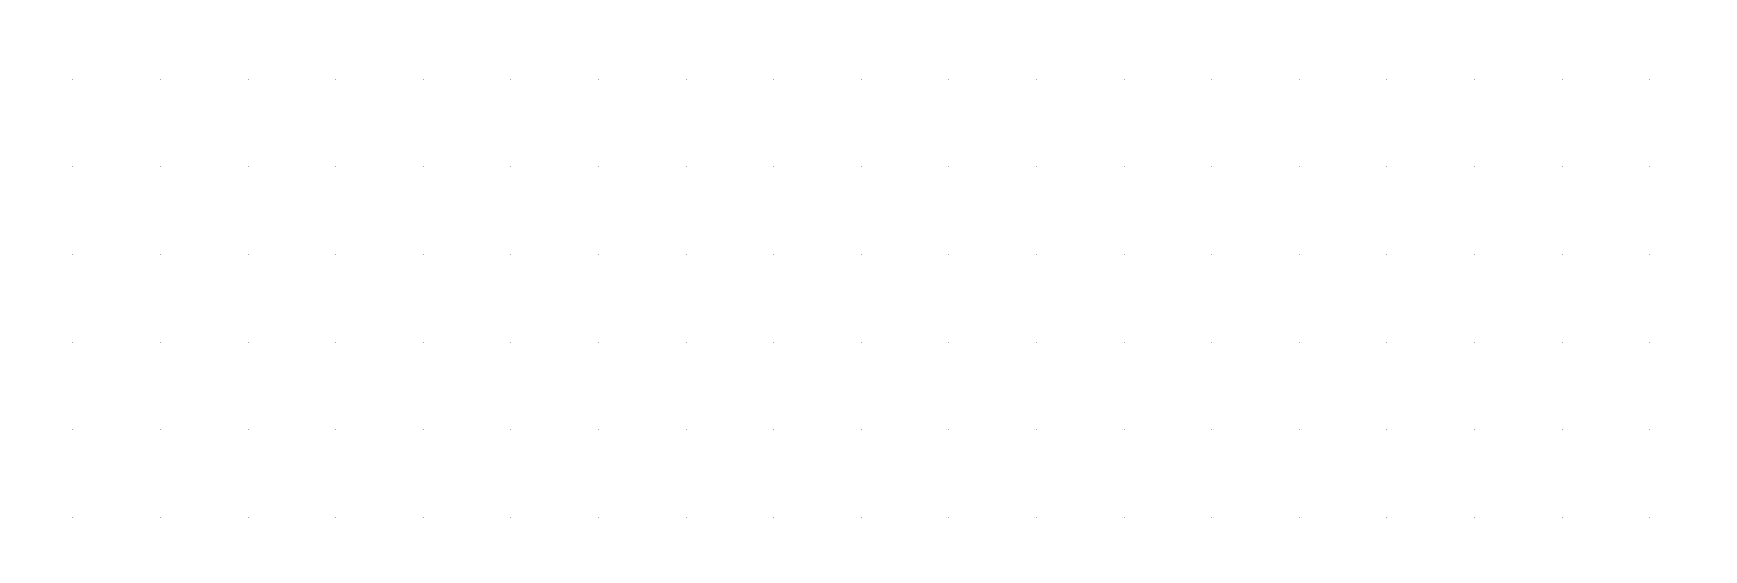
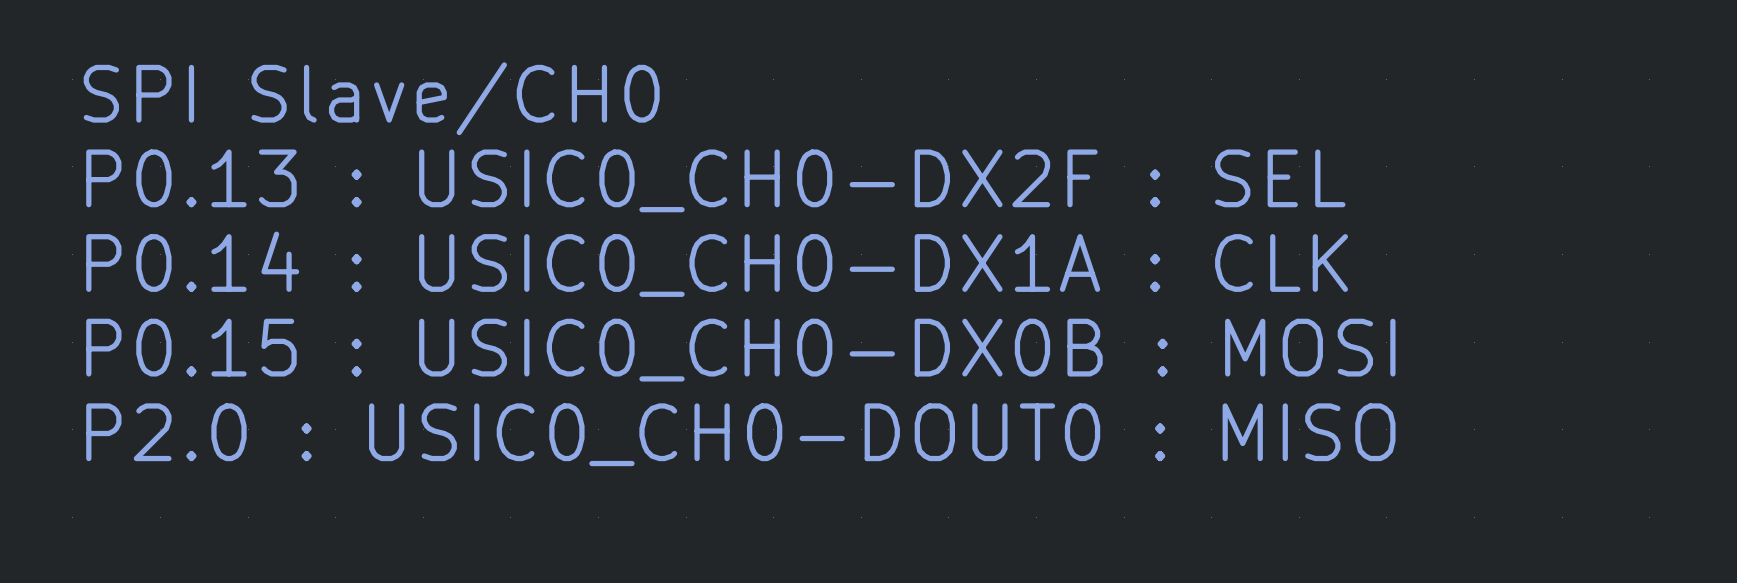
text: none -> SPI Slave/CH0 (371, 98)
text: none -> P0.13 : USIC0_CH0-DX2F : SEL (715, 180)
text: none -> P0.14 : USIC0_CH0-DX1A : CLK (717, 264)
text: none -> P0.15 : USIC0_CH0-DX0B : MOSI (740, 350)
text: none -> P2.0 : USIC0_CH0-DOUT0 : MISO (740, 434)

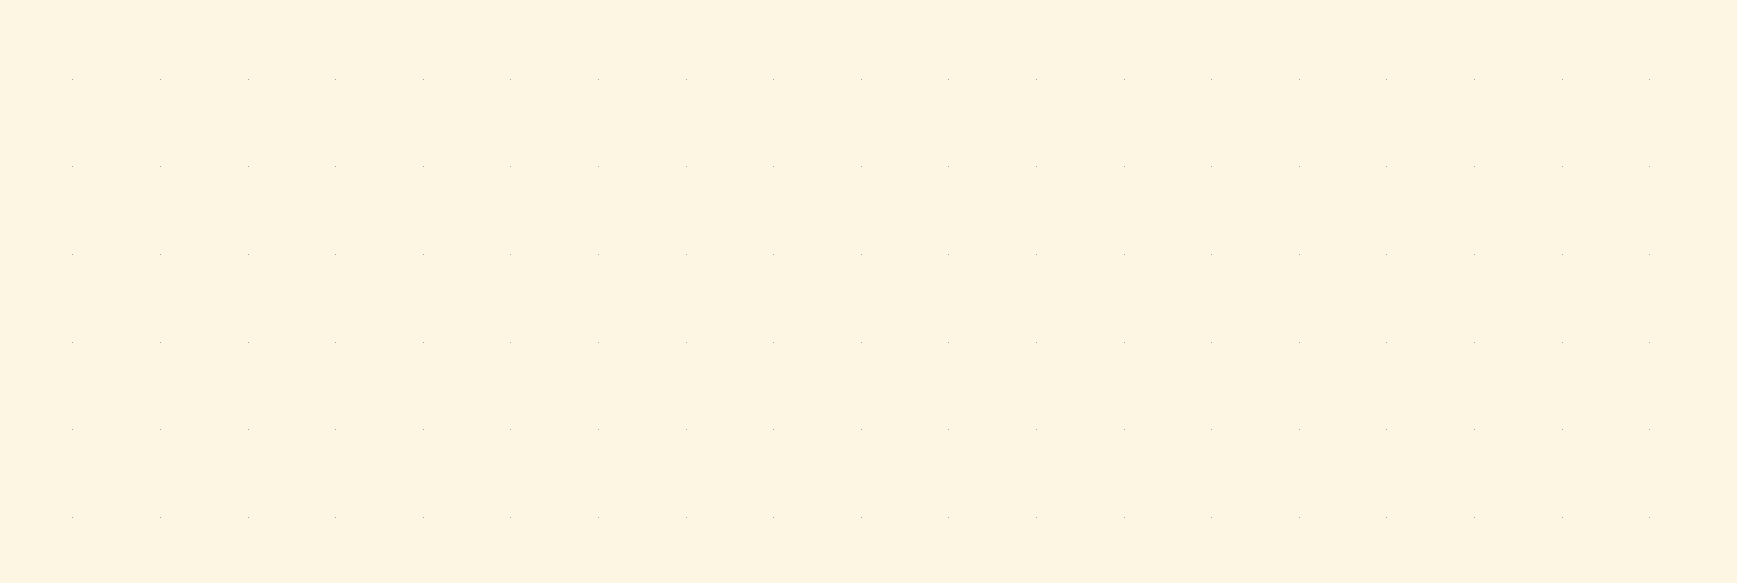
text: SPI Slave/CH0 (371, 98) -> none
text: P0.13 : USIC0_CH0-DX2F : SEL (715, 180) -> none
text: P0.14 : USIC0_CH0-DX1A : CLK (717, 264) -> none
text: P0.15 : USIC0_CH0-DX0B : MOSI (740, 350) -> none
text: P2.0 : USIC0_CH0-DOUT0 : MISO (740, 434) -> none

